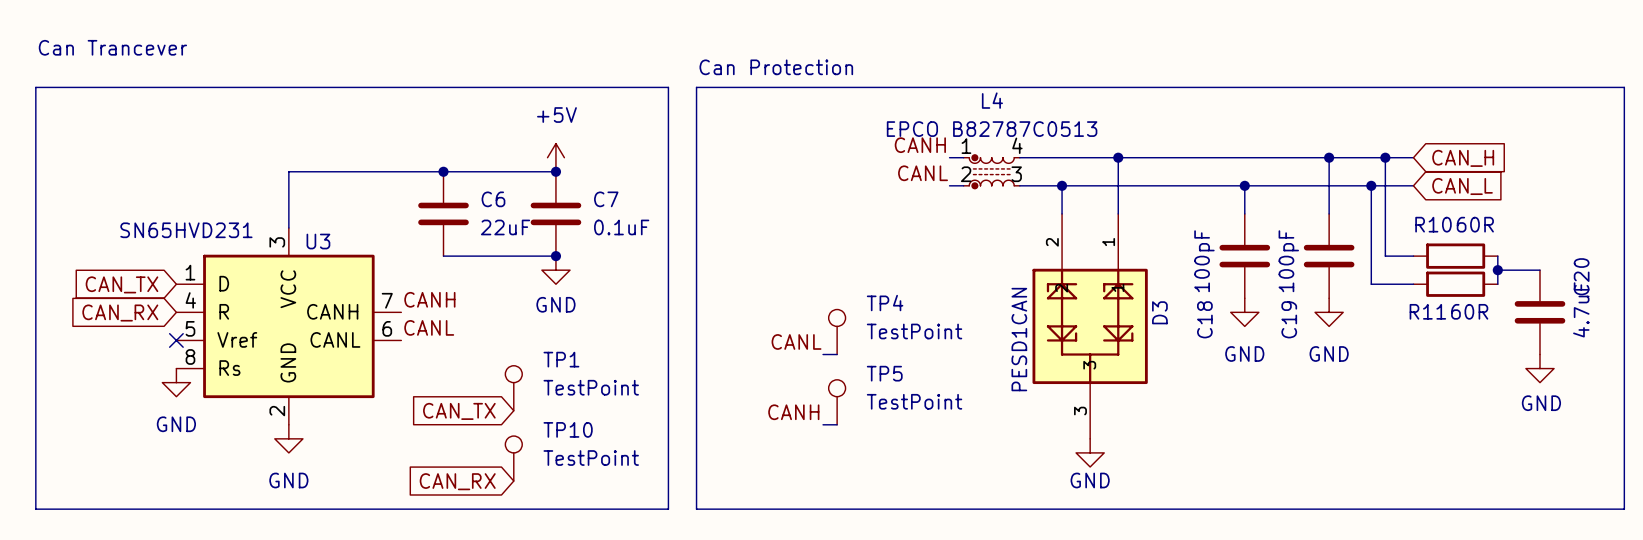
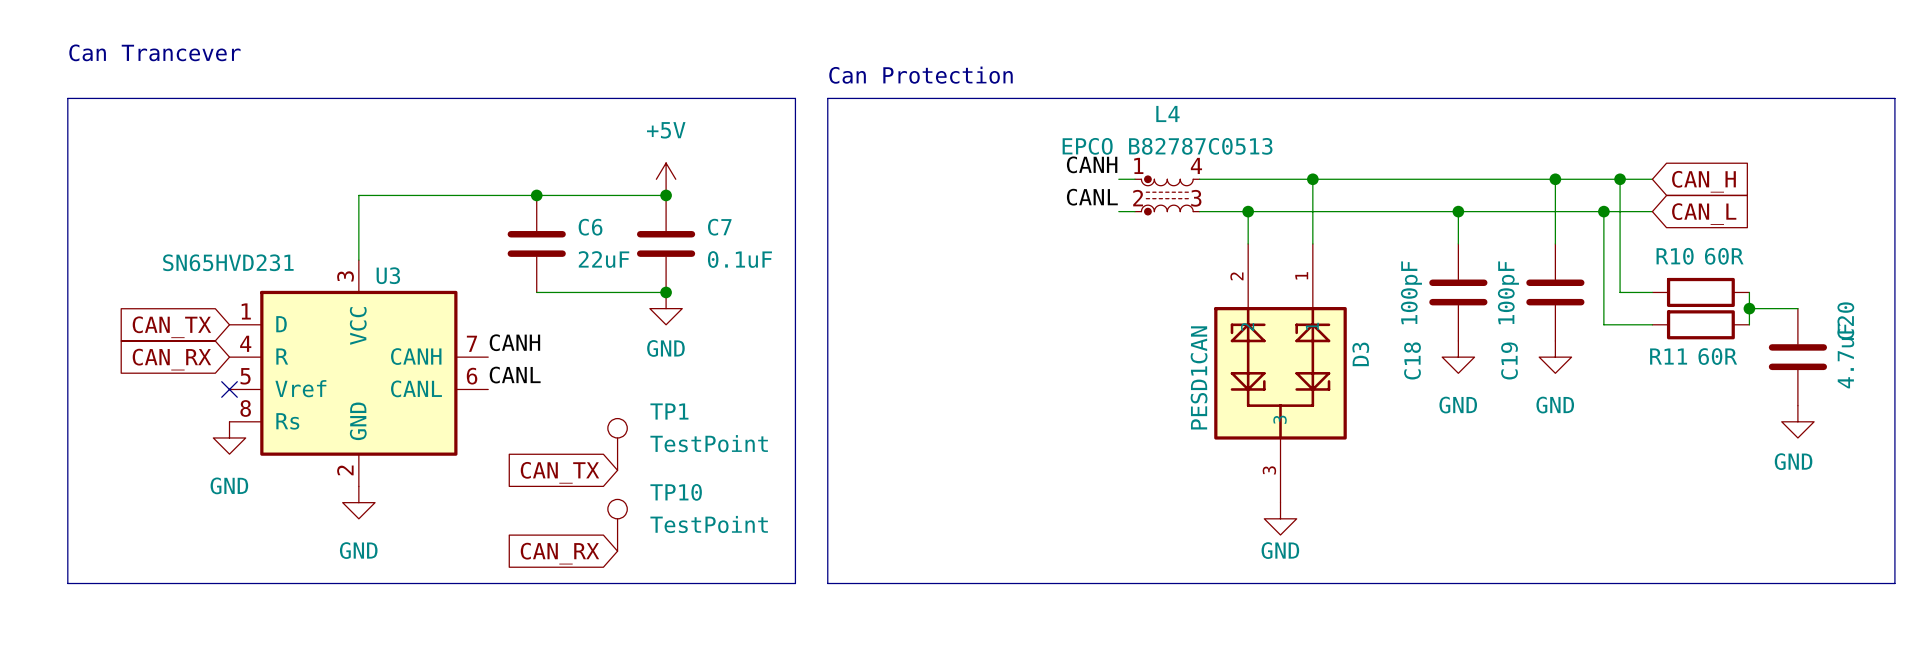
TP4: TestPoint (837, 332) -> none
label: CANL (796, 341) -> none
wire: (823, 354) (837, 354) -> none
TP5: TestPoint (837, 402) -> none
label: CANH (793, 412) -> none
wire: (823, 424) (837, 424) -> none

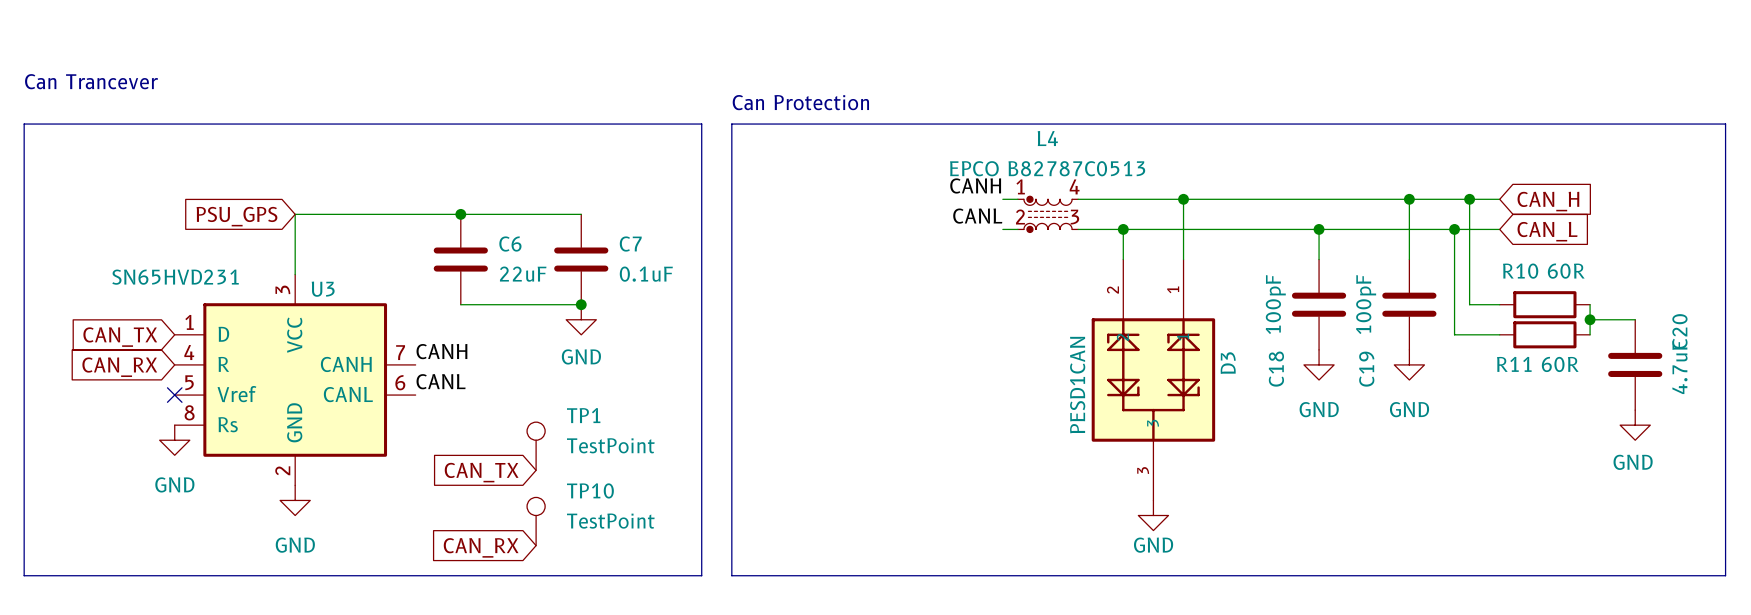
power symbol: +5V (666, 179) -> none
junction: (666, 195) -> none
global label: none -> PSU_GPS (236, 216)

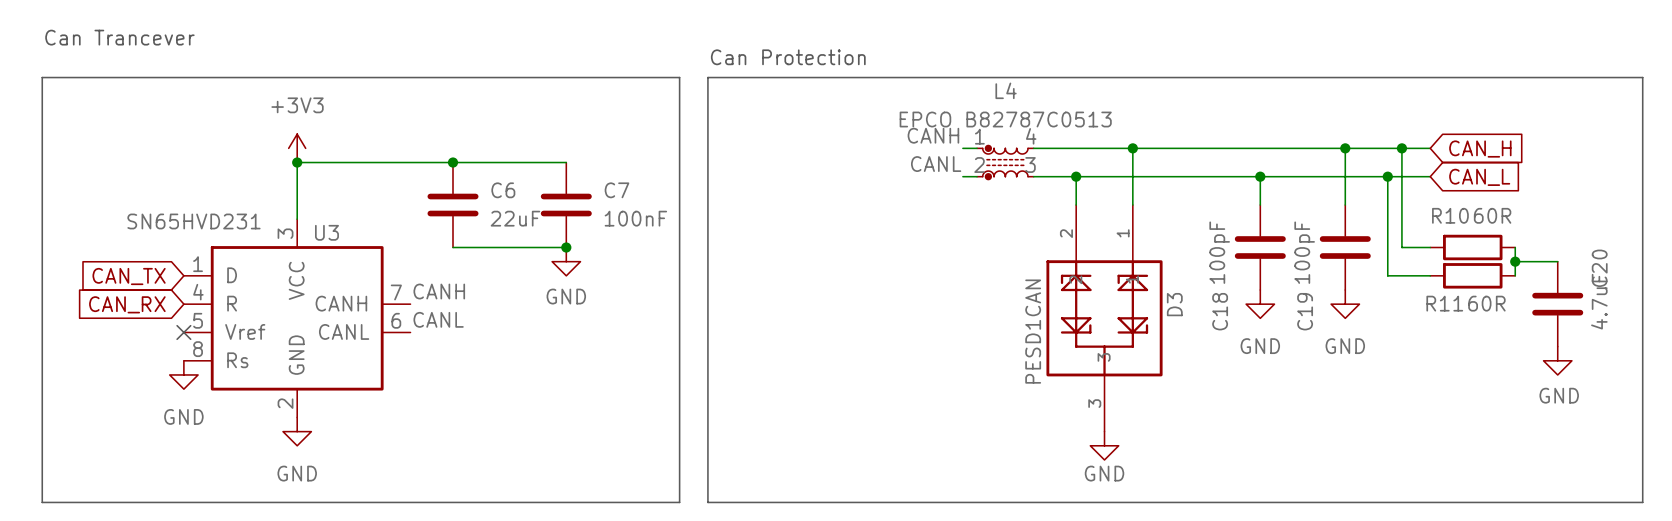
power symbol: none -> +3V3 (297, 148)
junction: none -> (297, 162)
global label: PSU_GPS (236, 216) -> none
C7 value: 0.1uF (646, 274) -> 100nF (635, 218)
TP1: TestPoint (536, 446) -> none
global label: CAN_TX (481, 472) -> none
TP10: TestPoint (536, 521) -> none
global label: CAN_RX (481, 547) -> none

